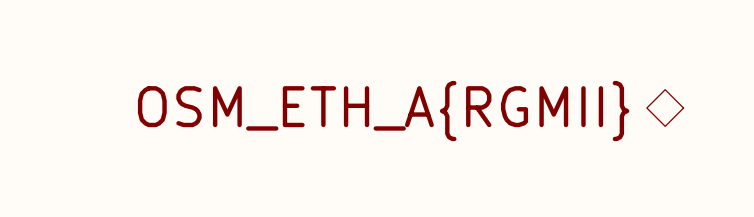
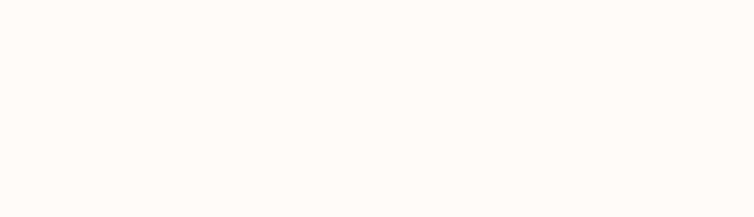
hierarchical label: OSM_ETH_A{RGMII} (383, 111) -> none

